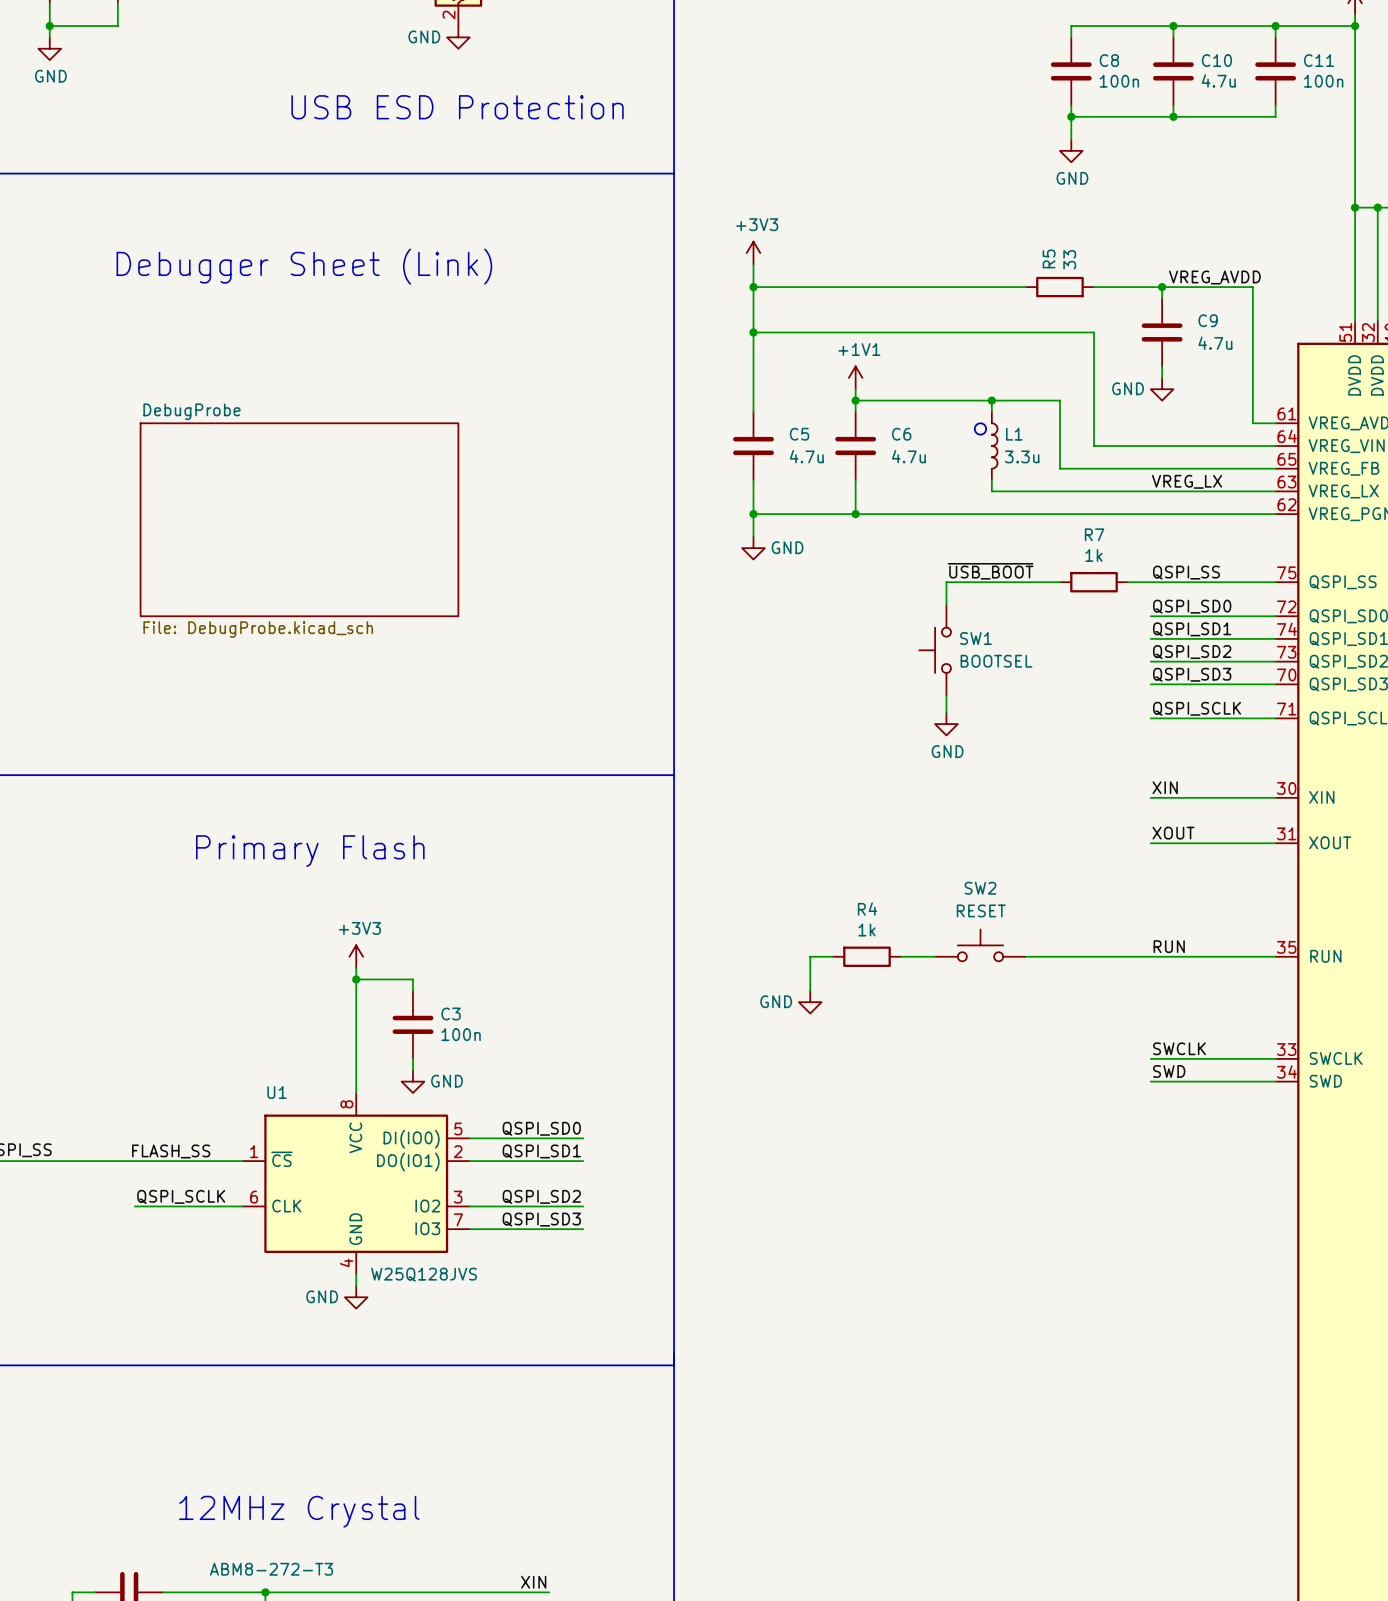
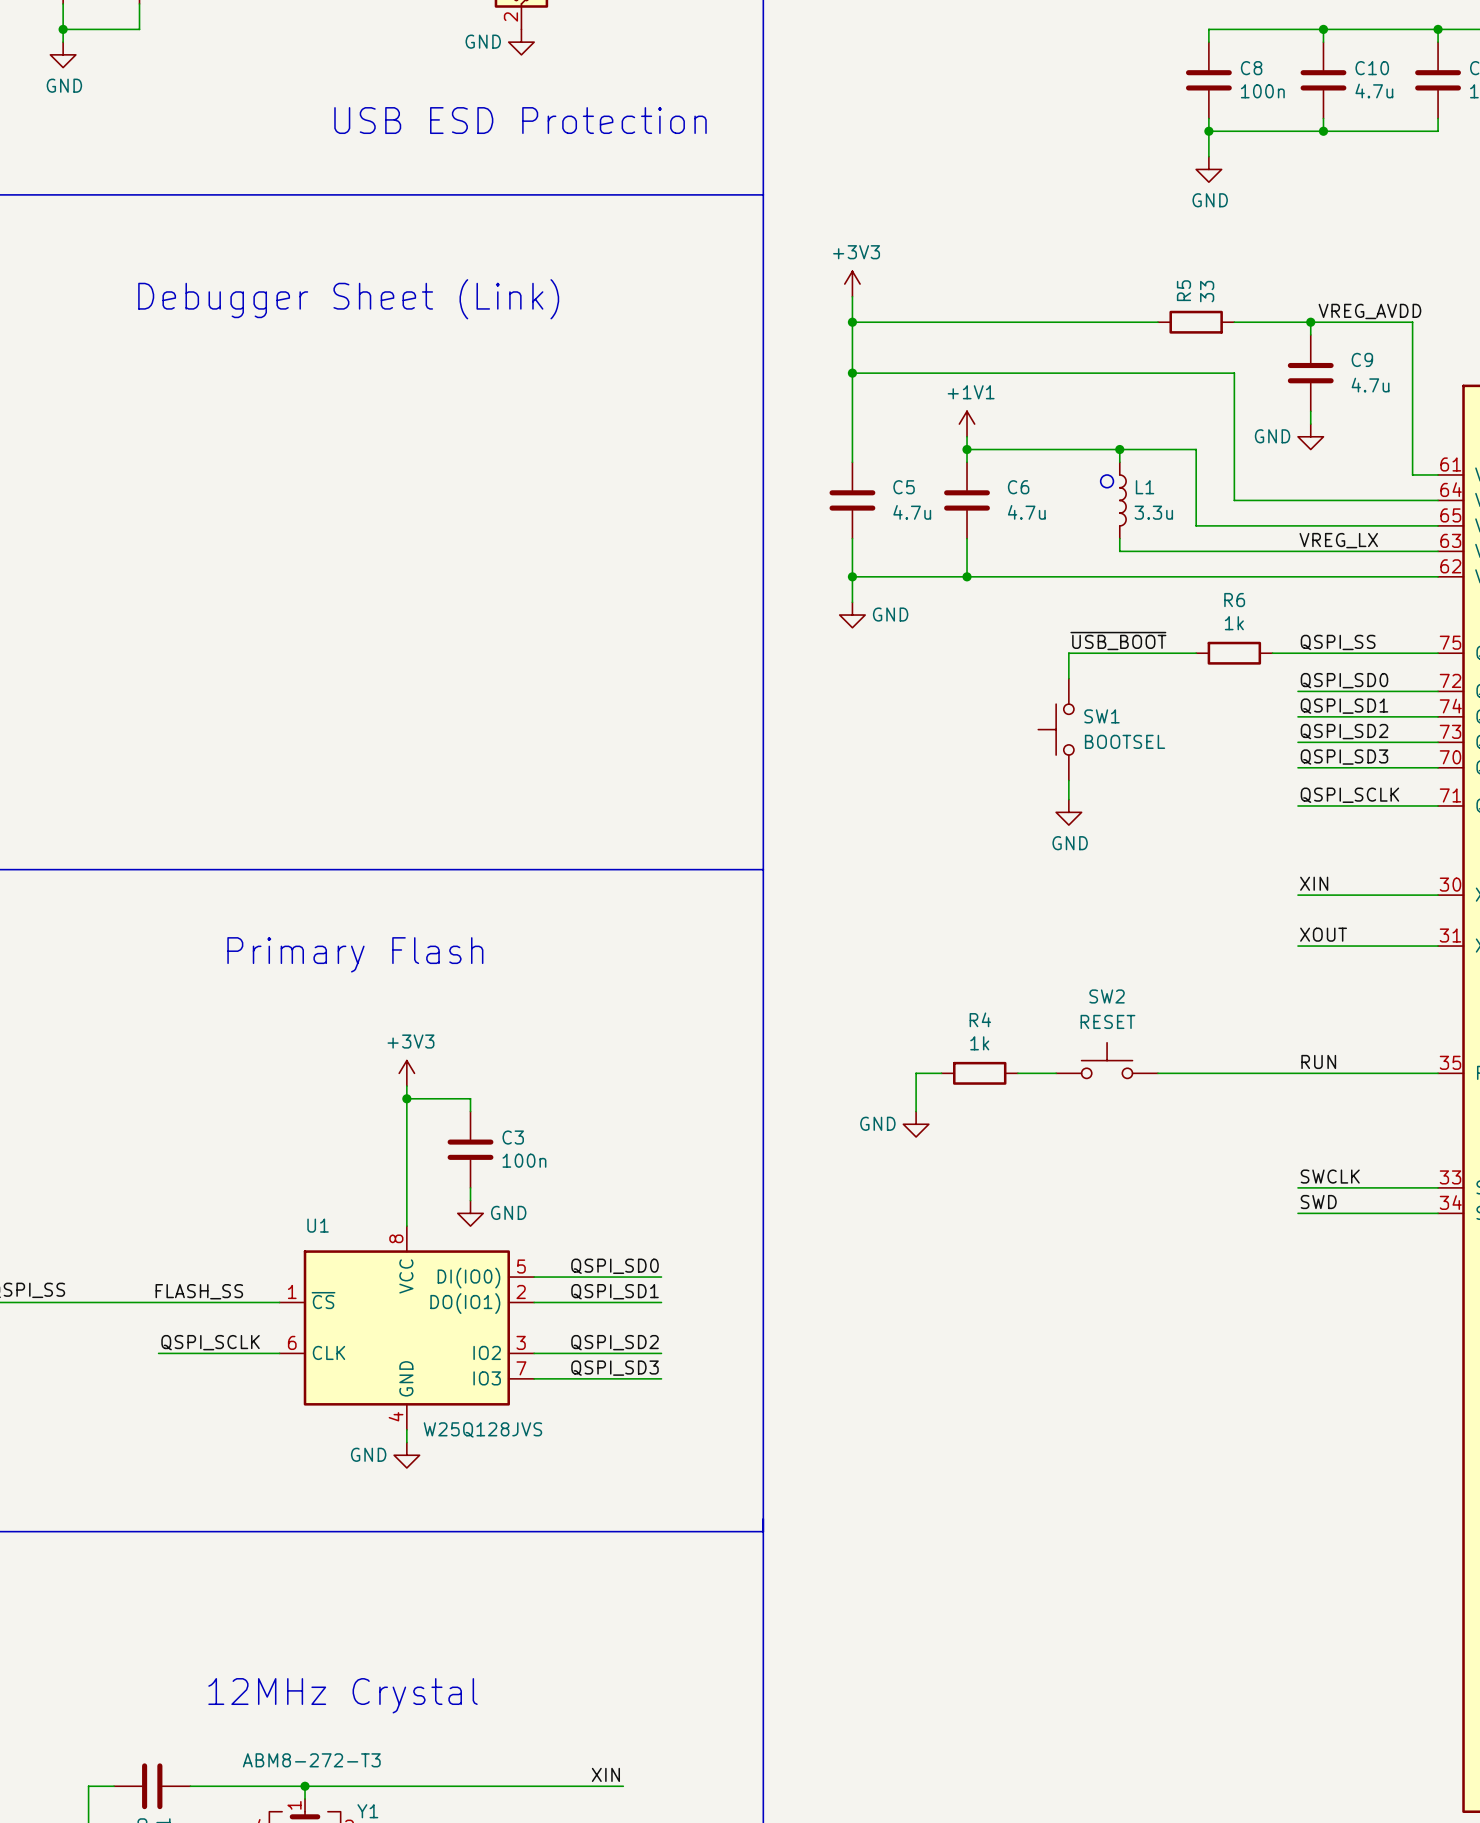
sheet DebugProbe: File: DebugProbe.kicad_sch (299, 519) -> none
R7 name: R7 (1094, 534) -> R6 (1234, 600)

